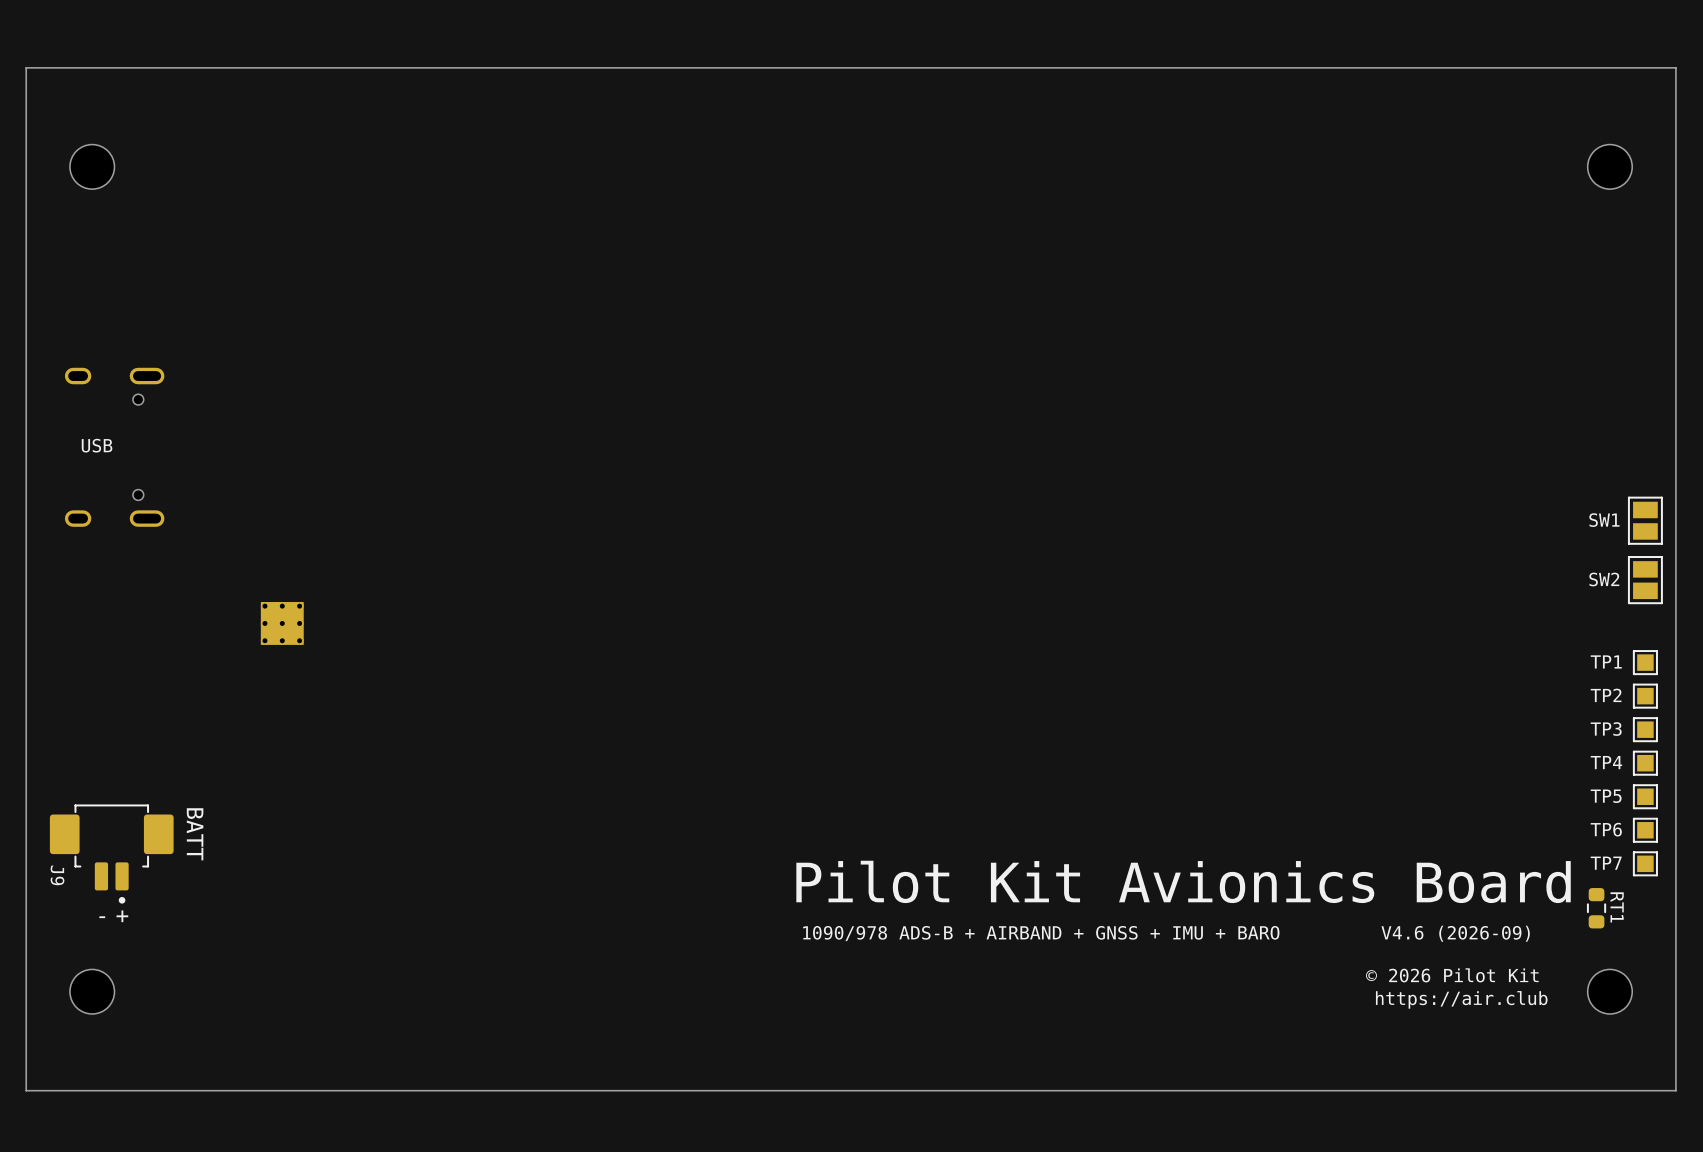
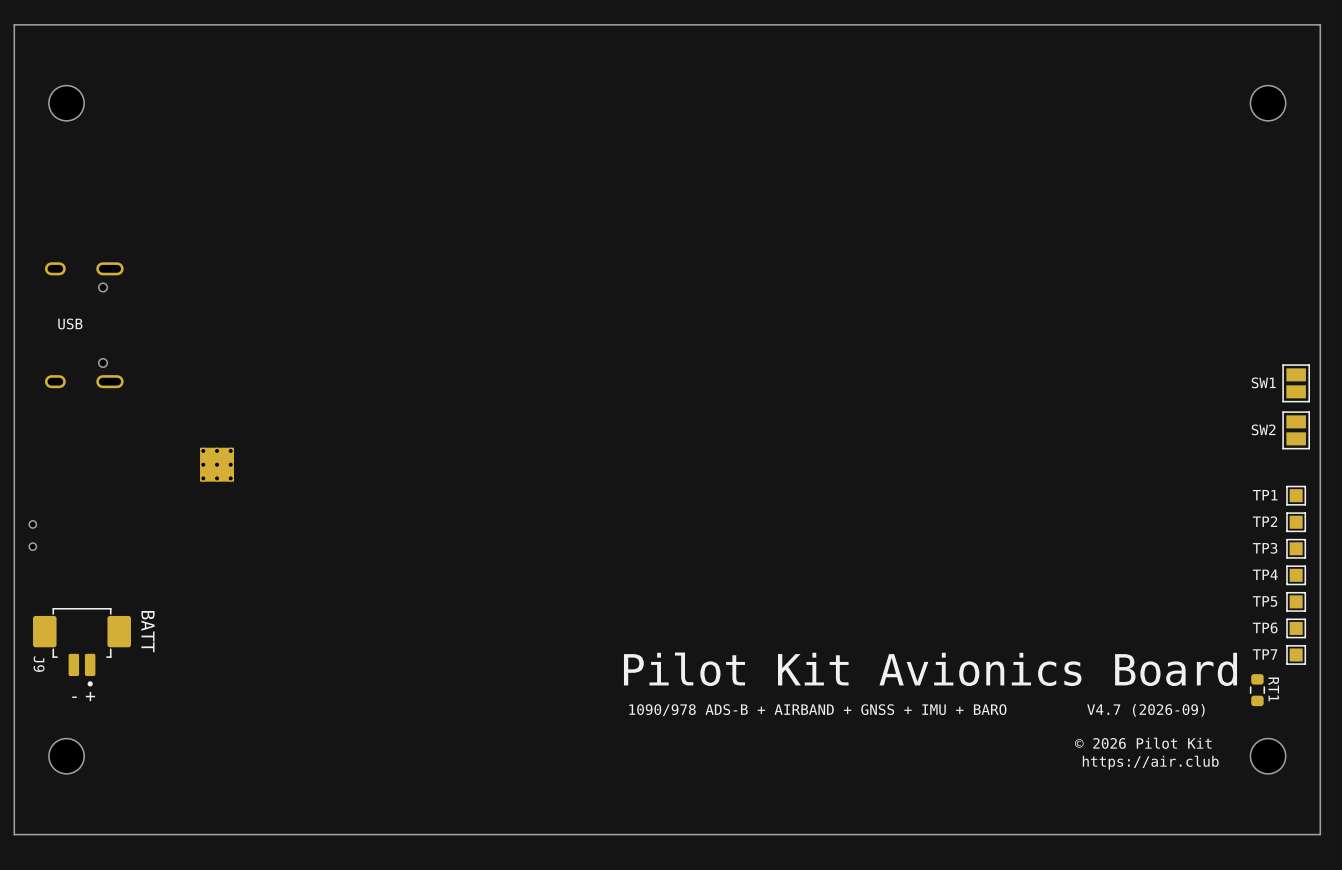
part: none -> (32, 535)
text: V4.6 (2026-09) (1455, 933) -> V4.7 (2026-09) (1145, 710)

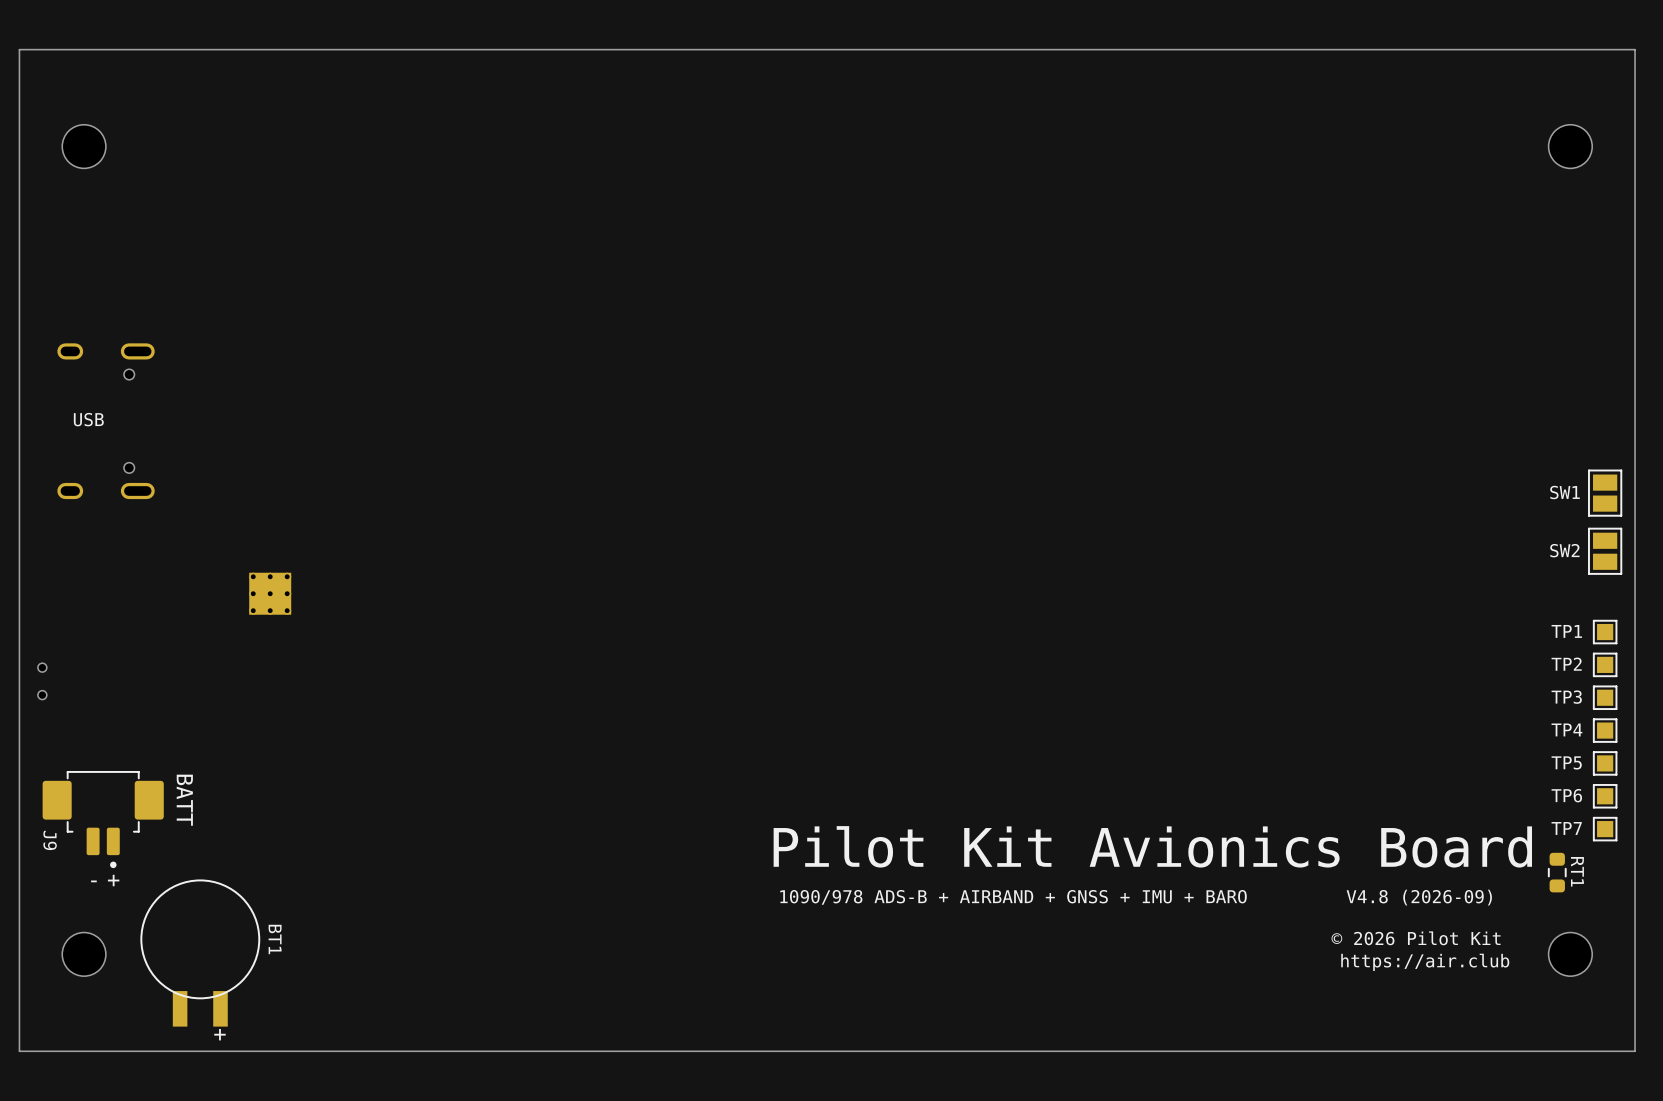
text: V4.7 (2026-09) (1145, 710) -> V4.8 (2026-09) (1419, 897)
BT1: none -> (200, 953)

